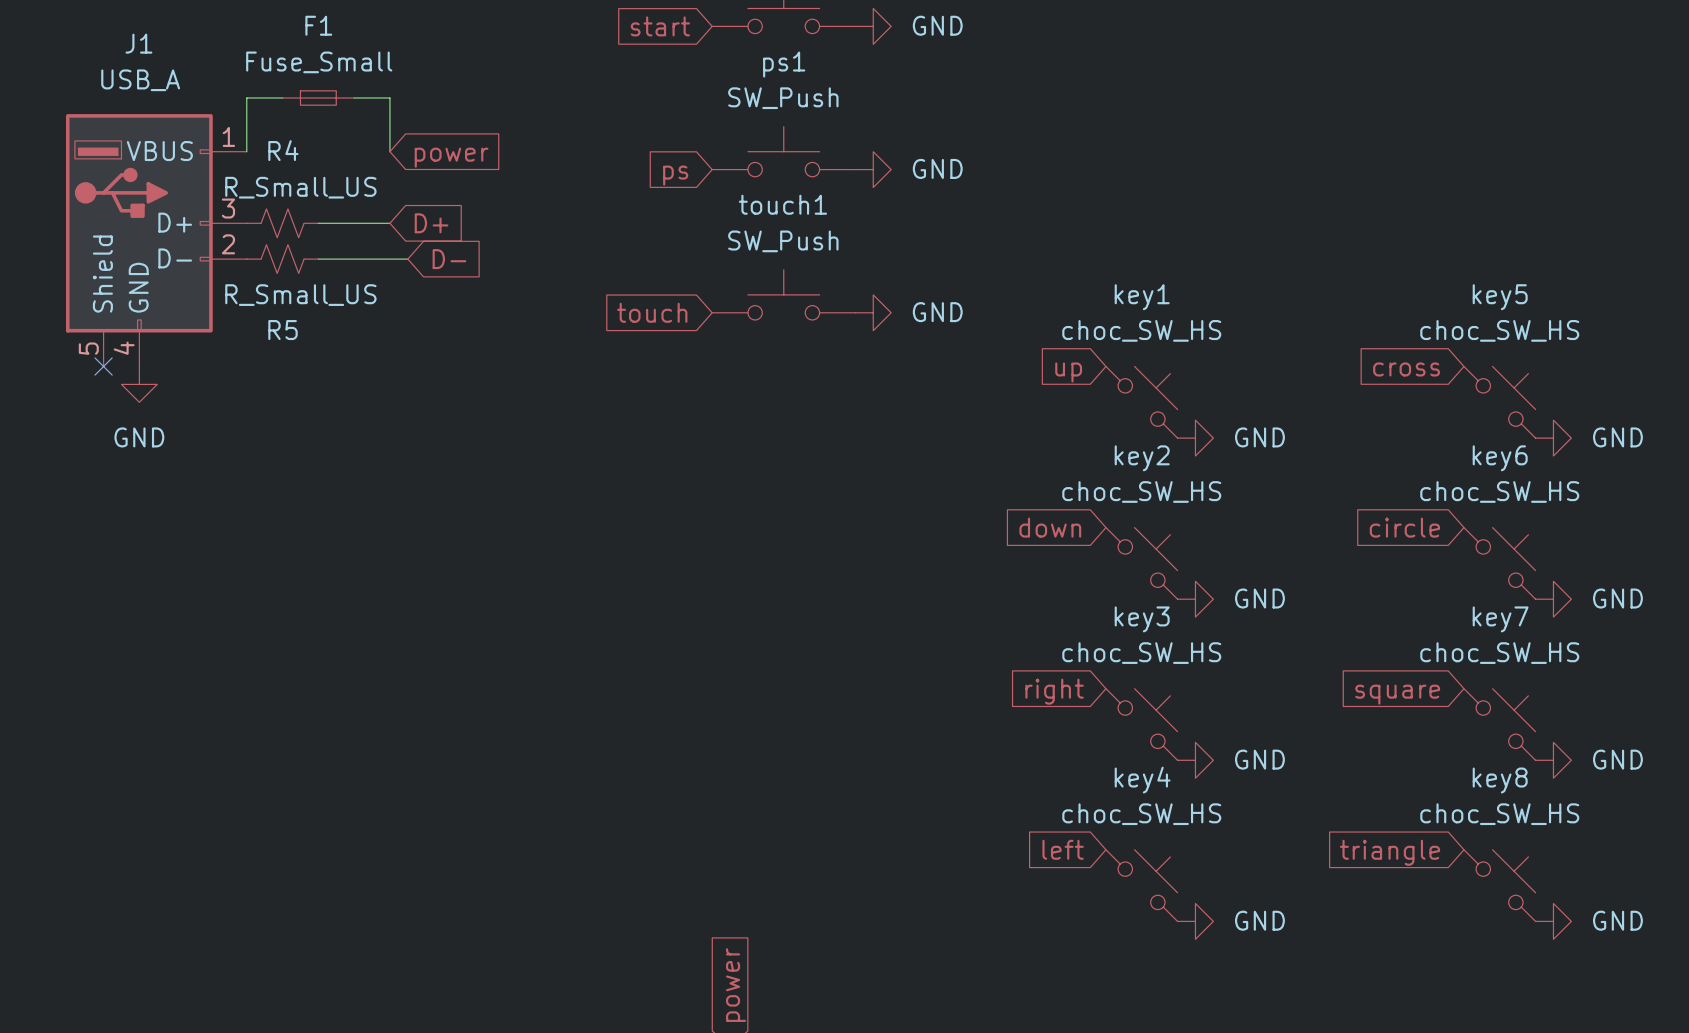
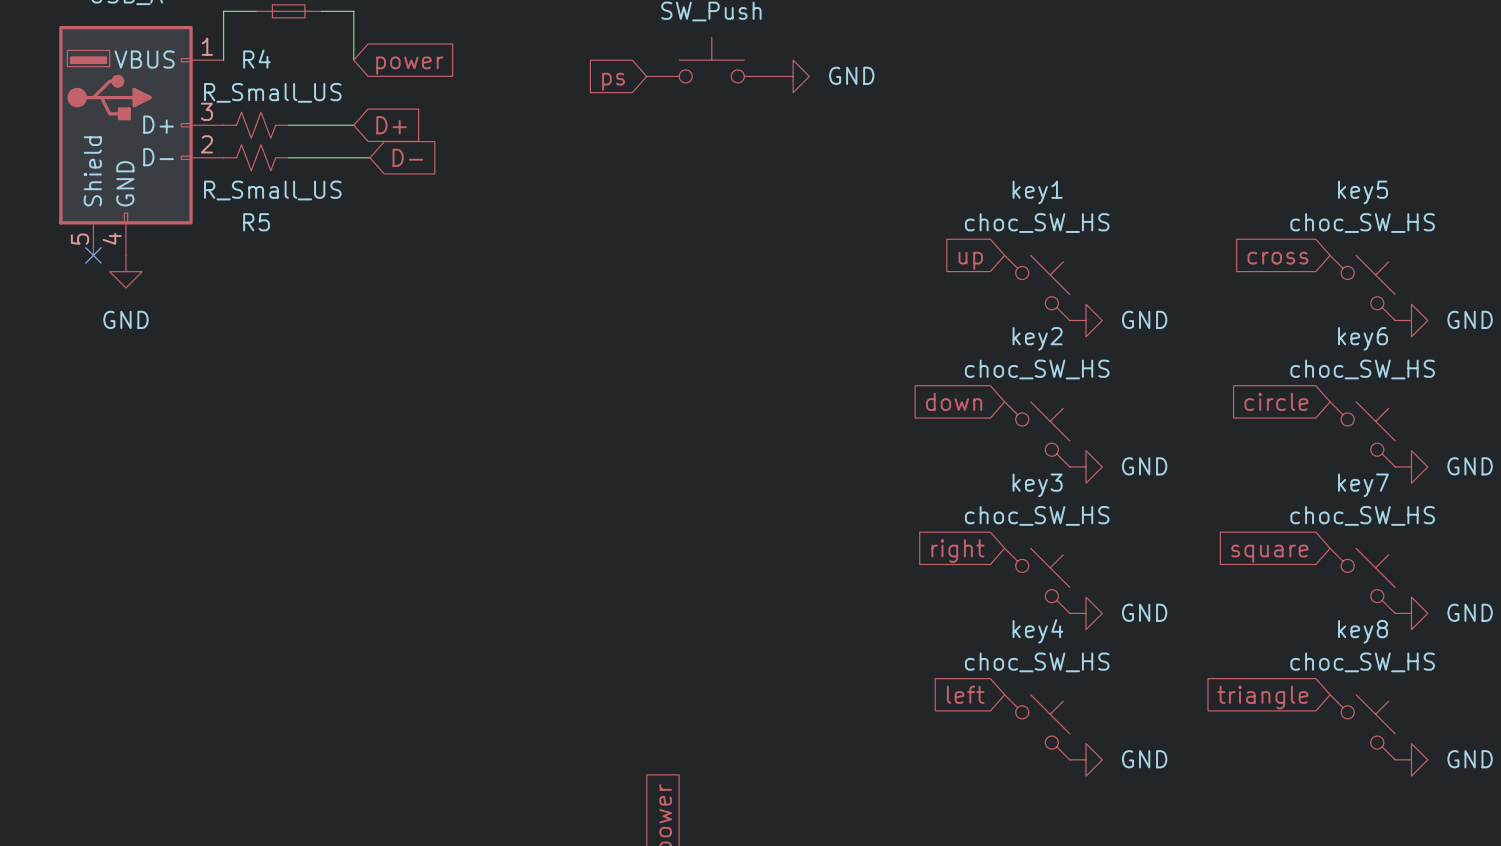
touch1: SW_Push (783, 294) -> none
global label: touch (652, 312) -> none
power symbol: GND (873, 312) -> none

